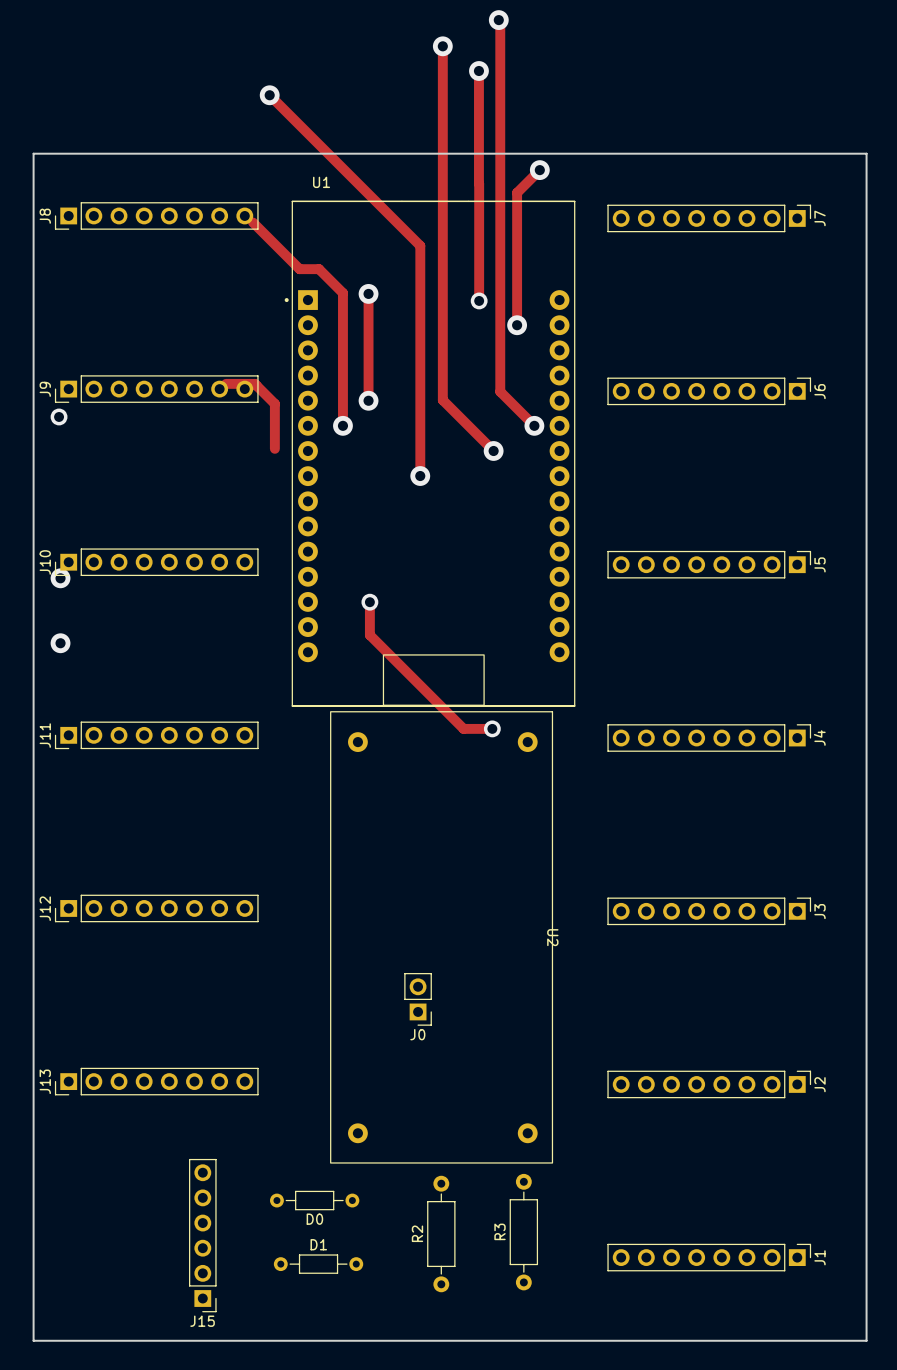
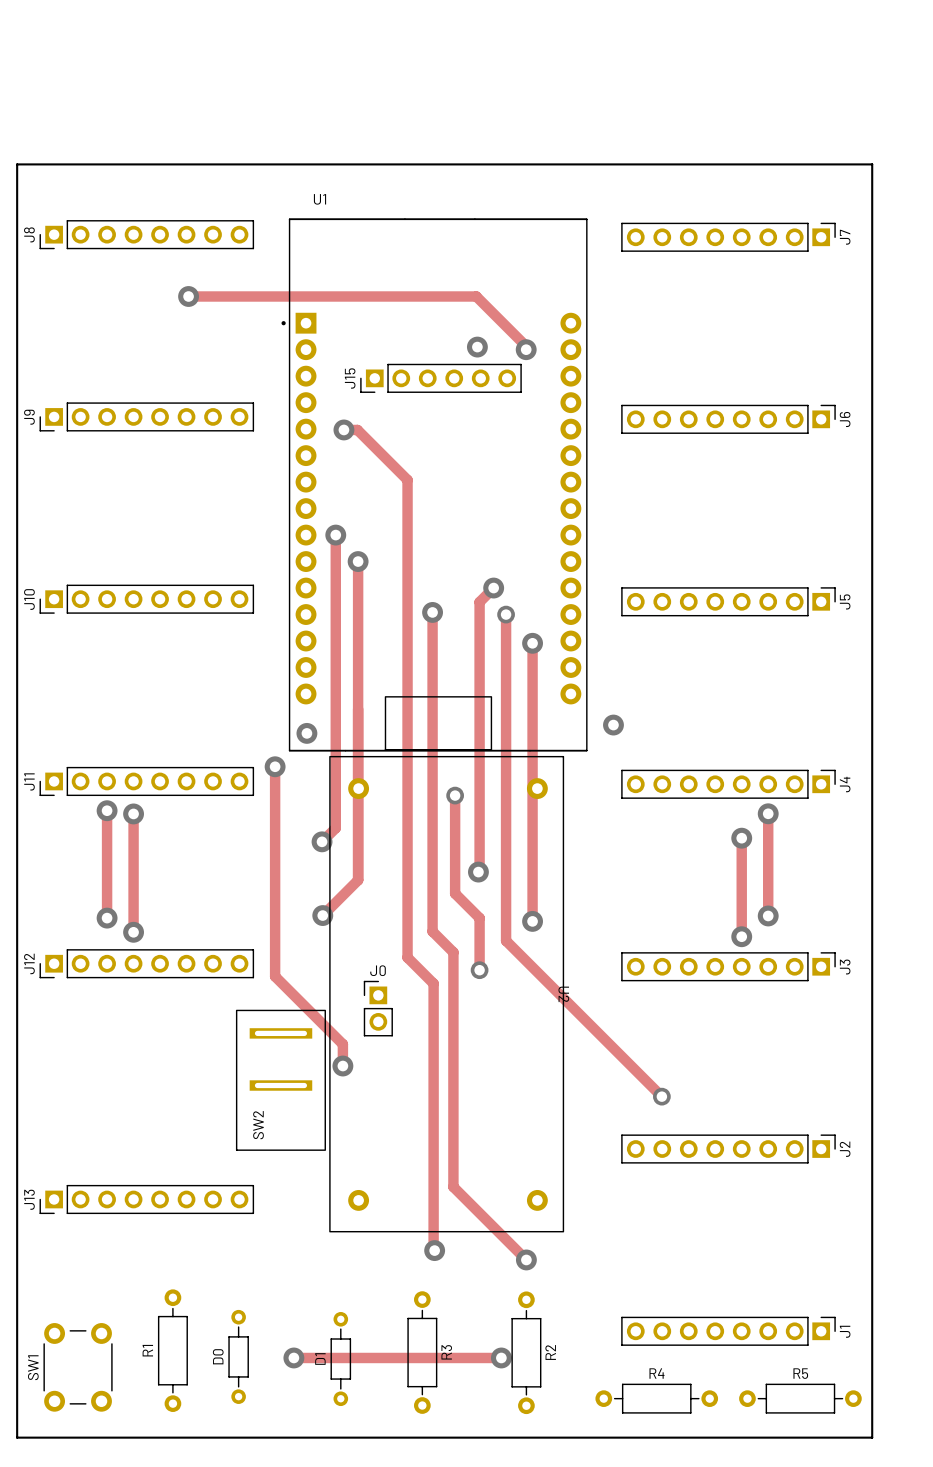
track: (498, 20) (500, 391) (534, 425) -> none
via: (498, 20) -> none
track: (442, 46) (442, 400) (493, 450) -> none
via: (442, 46) -> none
track: (478, 70) (479, 300) -> none
via: (478, 70) -> none
track: (269, 95) (420, 245) (420, 475) -> none
via: (269, 95) -> none
board edge: (33, 153) (866, 153) (866, 1340) (33, 1340) -> (17, 169) (17, 164) (872, 164) (872, 1437) (17, 1437) (17, 1418)
track: (539, 170) (517, 192) (517, 325) -> none
via: (539, 170) -> none
track: (253, 222) (299, 269) (319, 269) (342, 293) (342, 425) -> none
track: none -> (188, 296) (476, 296) (525, 345)
via: none -> (188, 296)
track: (368, 293) (368, 400) -> none
via: (368, 293) -> none
via: (479, 300) -> none
via: none -> (477, 347)
track: (226, 383) (254, 383) (274, 403) (274, 448) -> none
via: (368, 400) -> none
track: none -> (343, 429) (357, 429) (407, 480) (407, 957) (433, 983) (434, 1250)
via: none -> (343, 429)
via: (59, 416) -> none
via: (342, 425) -> none
via: (534, 425) -> none
via: (493, 450) -> none
via: (420, 476) -> none
track: none -> (335, 535) (335, 828) (322, 841)
via: none -> (335, 535)
track: none -> (358, 561) (358, 880) (322, 915)
via: none -> (358, 561)
track: none -> (493, 588) (479, 602) (478, 872)
via: none -> (493, 588)
track: none -> (432, 612) (432, 931) (453, 952) (453, 1186) (526, 1259)
via: none -> (432, 612)
track: none -> (506, 614) (506, 940) (662, 1096)
via: none -> (506, 614)
via: (60, 578) -> none
track: (369, 602) (369, 635) (463, 728) (492, 728) -> none
via: (369, 602) -> none
track: none -> (532, 643) (532, 921)
via: none -> (532, 643)
via: (60, 643) -> none
via: none -> (613, 725)
via: none -> (306, 733)
track: none -> (275, 766) (275, 976) (342, 1044) (342, 1069)
via: none -> (275, 766)
via position: (492, 728) -> (455, 795)
track: none -> (455, 795) (455, 893) (479, 918) (479, 970)
track: none -> (107, 810) (107, 918)
via: none -> (107, 810)
track: none -> (133, 813) (133, 932)
via: none -> (133, 813)
track: none -> (768, 813) (768, 915)
via: none -> (768, 813)
track: none -> (741, 838) (741, 936)
via: none -> (741, 838)
via: none -> (322, 841)
via: none -> (478, 872)
via: none -> (322, 915)
via: none -> (768, 915)
via: none -> (107, 918)
via: none -> (532, 921)
via: none -> (133, 932)
via: none -> (741, 936)
via: none -> (479, 970)
J0 rotation: 0° (418, 999) -> 180° (378, 1008)
J0 position: (418, 999) -> (378, 1008)
via: none -> (342, 1066)
SW2: none -> (280, 1080)
via: none -> (661, 1096)
J13 position: (156, 1081) -> (146, 1199)
via: none -> (434, 1250)
via: none -> (526, 1259)
D0 rotation: 0° (314, 1200) -> 90° clockwise (238, 1356)
D0 position: (314, 1200) -> (238, 1356)
R3 name position: R3 (500, 1231) -> R3 (446, 1352)
R3 position: (523, 1232) -> (422, 1352)
R2 name position: R2 (417, 1233) -> R2 (550, 1352)
R2 position: (441, 1234) -> (526, 1352)
J15 rotation: 0° (202, 1235) -> 90° clockwise (440, 378)
J15 position: (202, 1235) -> (440, 378)
D1 name position: D1 (318, 1244) -> D1 (320, 1359)
D1 rotation: 0° (318, 1264) -> 90° clockwise (340, 1359)
R1: none -> (172, 1350)
track: none -> (293, 1357) (501, 1357)
via: none -> (293, 1357)
via: none -> (501, 1357)
SW1: none -> (78, 1367)
R4: none -> (656, 1398)
R5: none -> (800, 1398)

